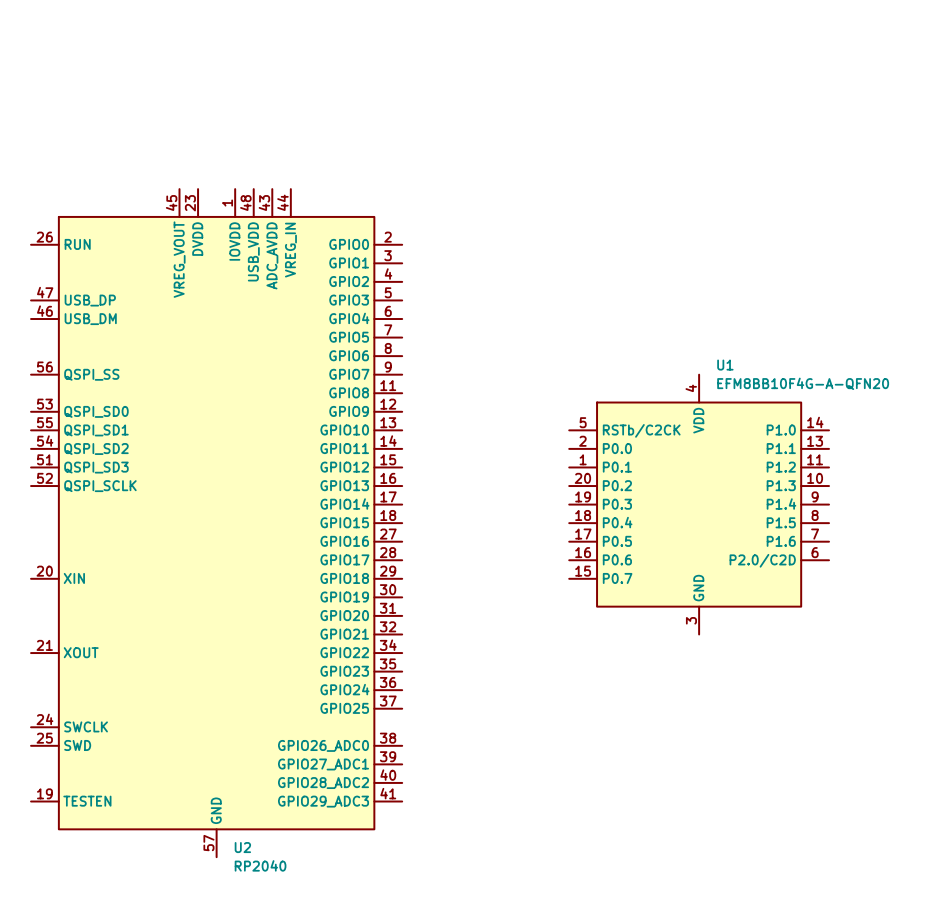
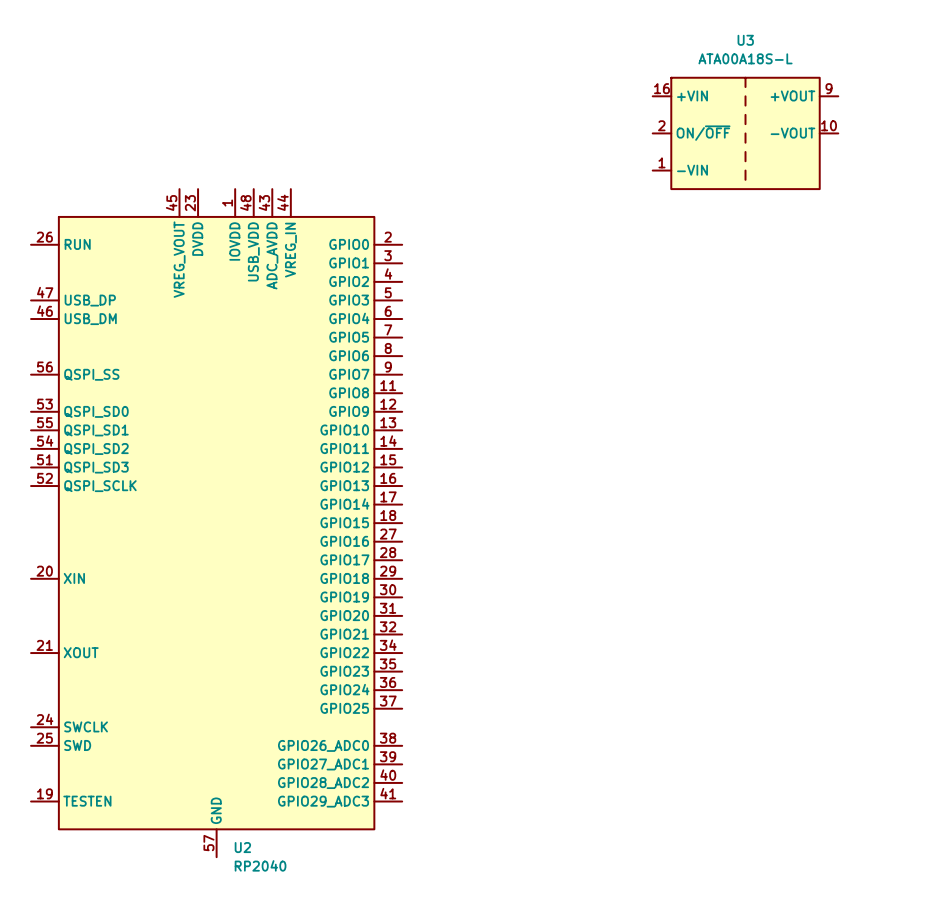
U3: none -> ATA00A18S-L (745, 133)
U1: EFM8BB10F4G-A-QFN20 (699, 504) -> none

